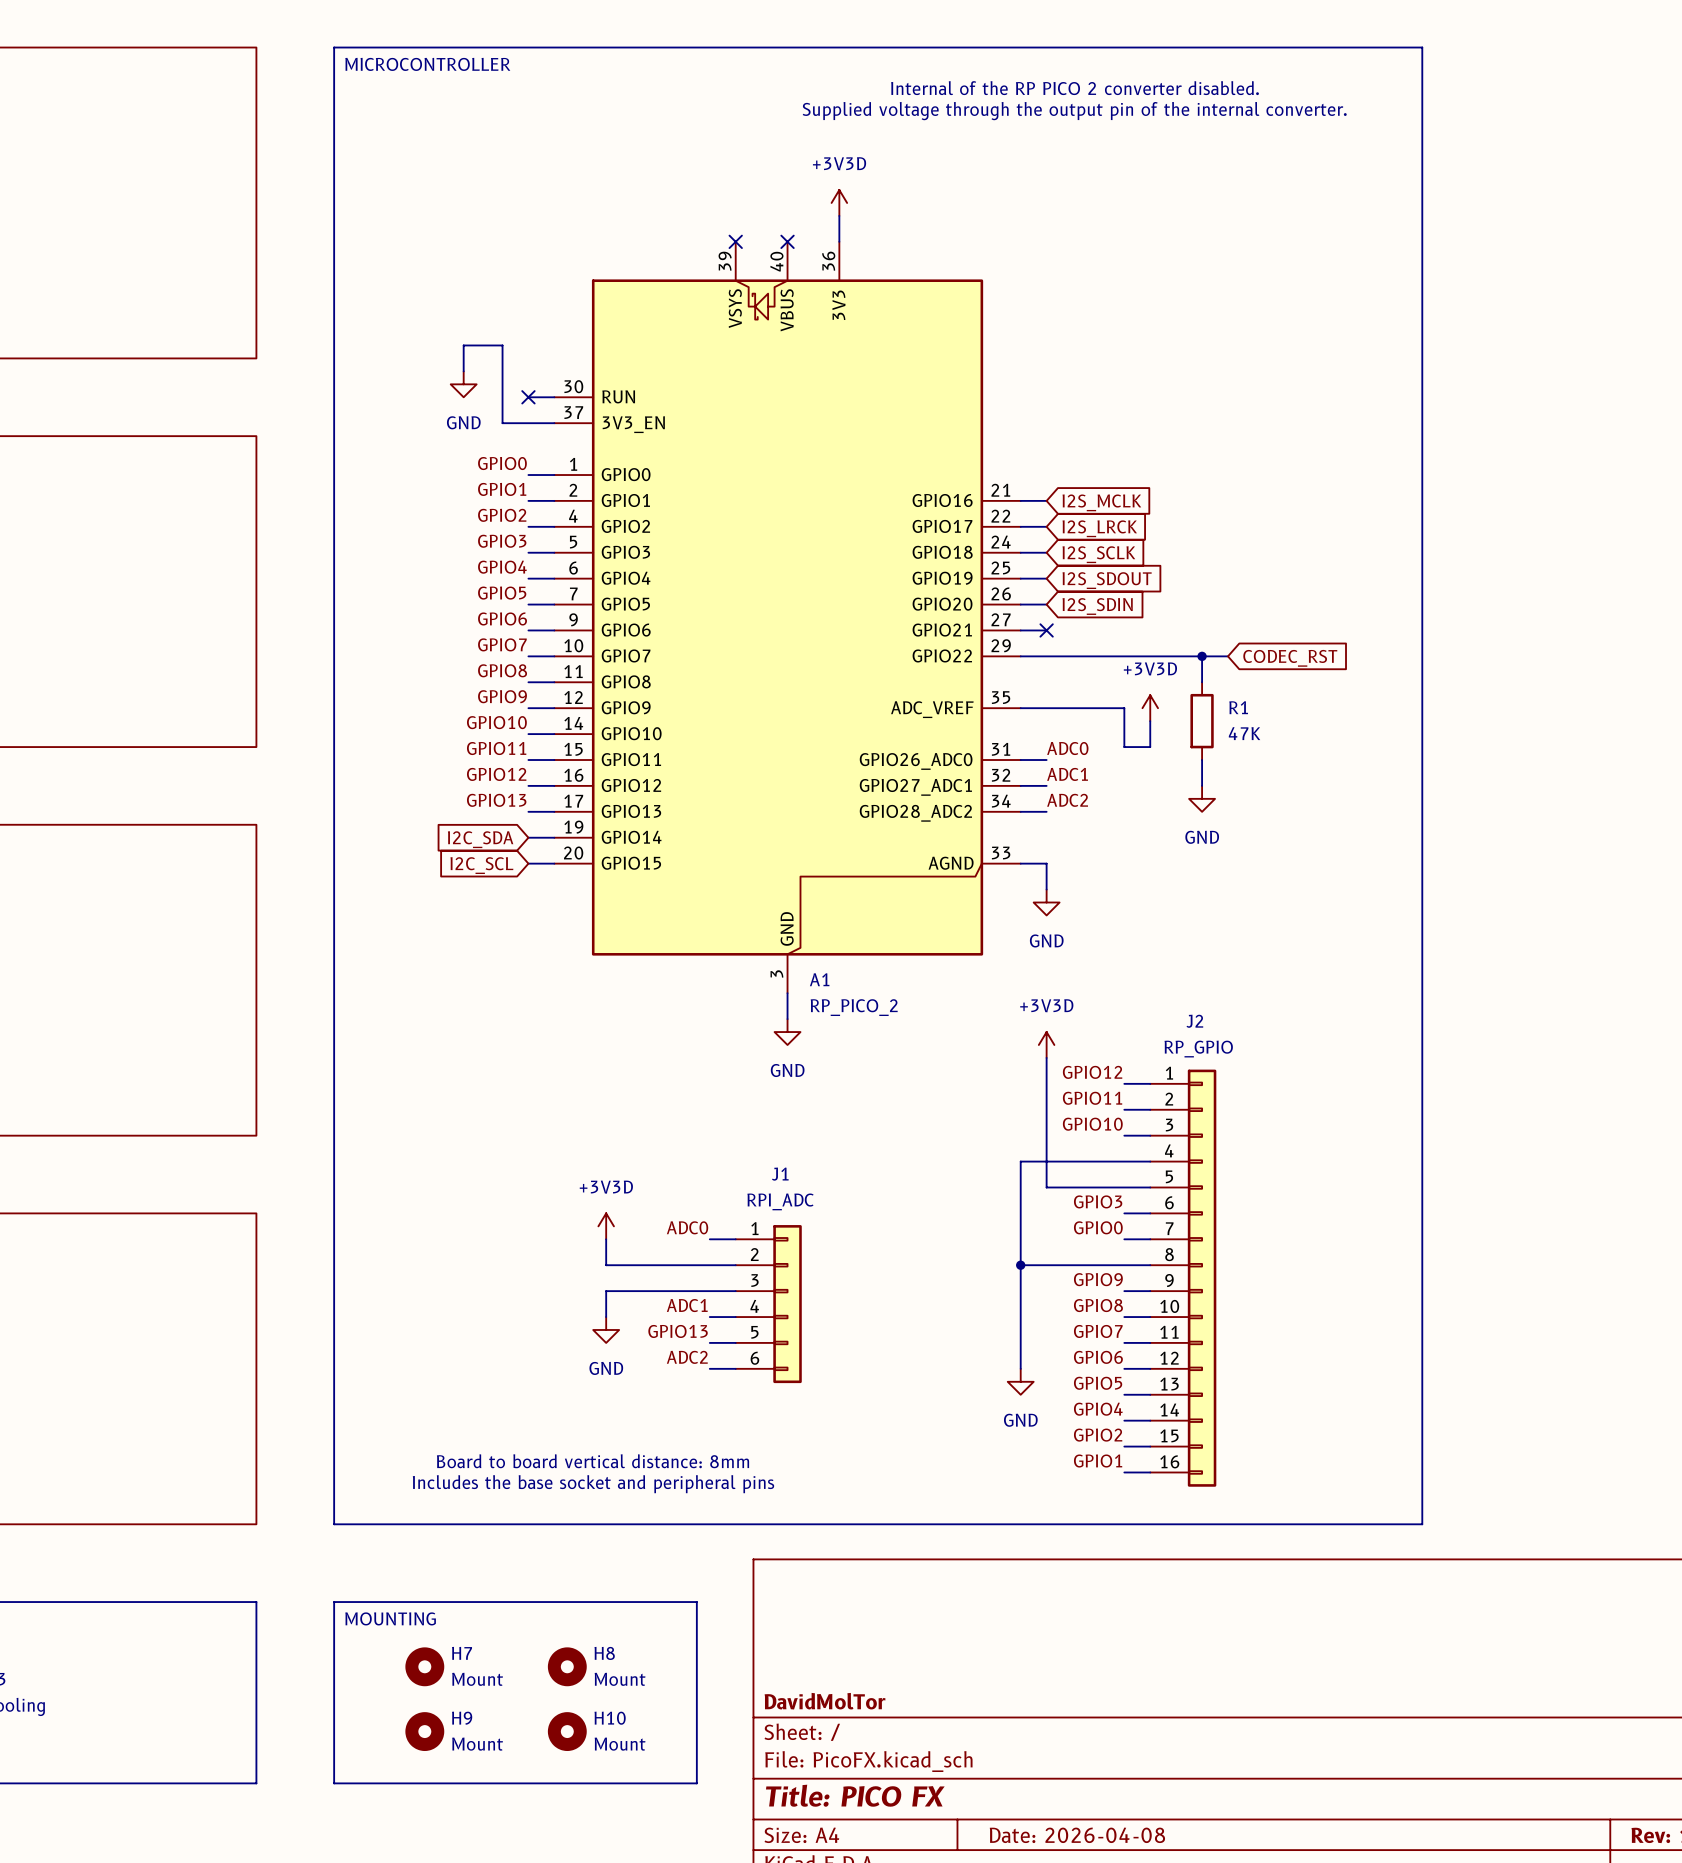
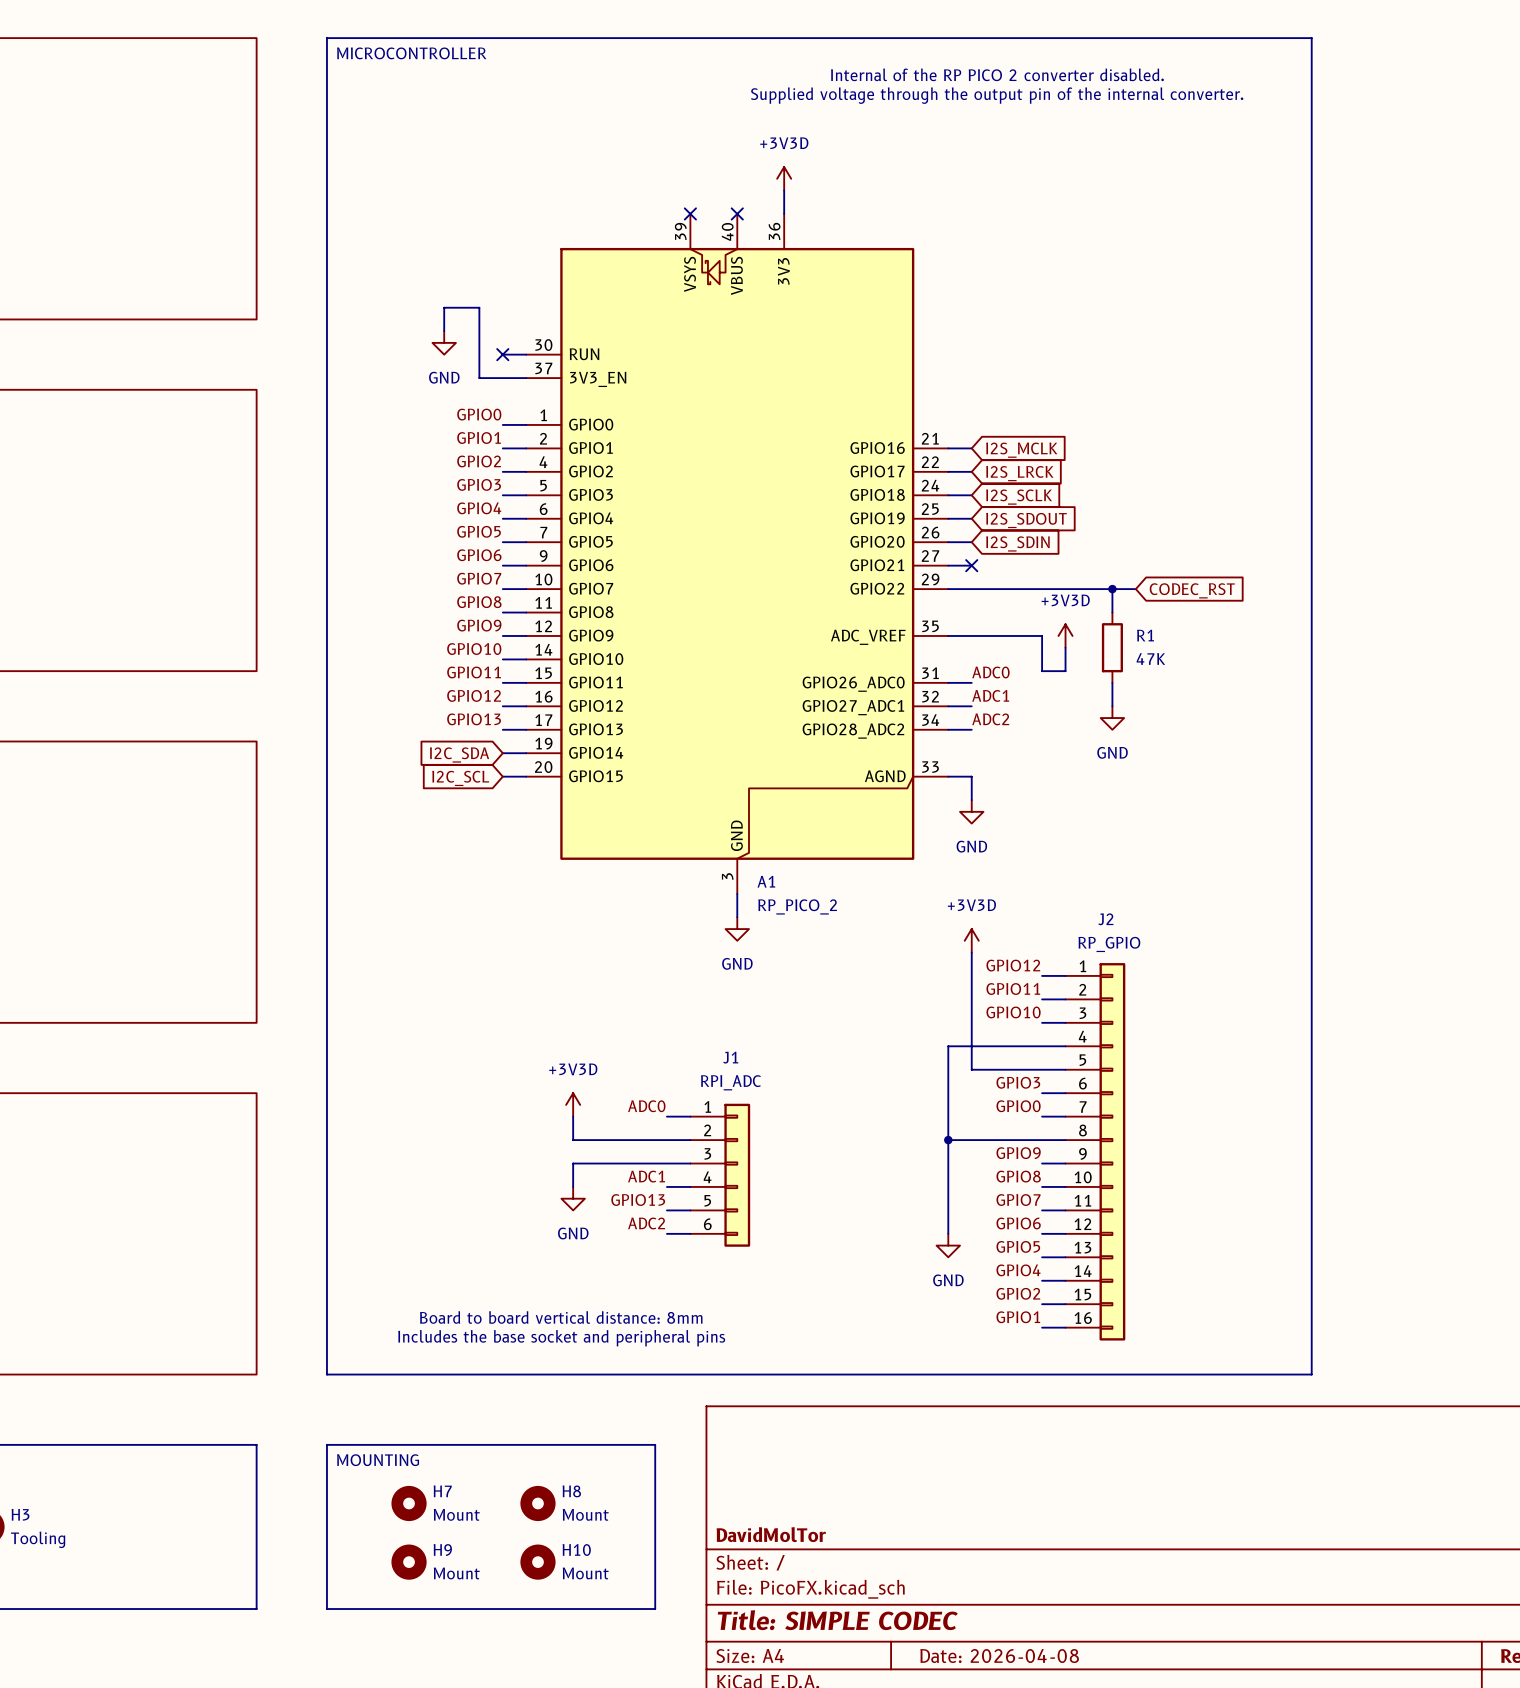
title block: Title: PICO FX (855, 1795) -> Title: SIMPLE CODEC (837, 1620)

